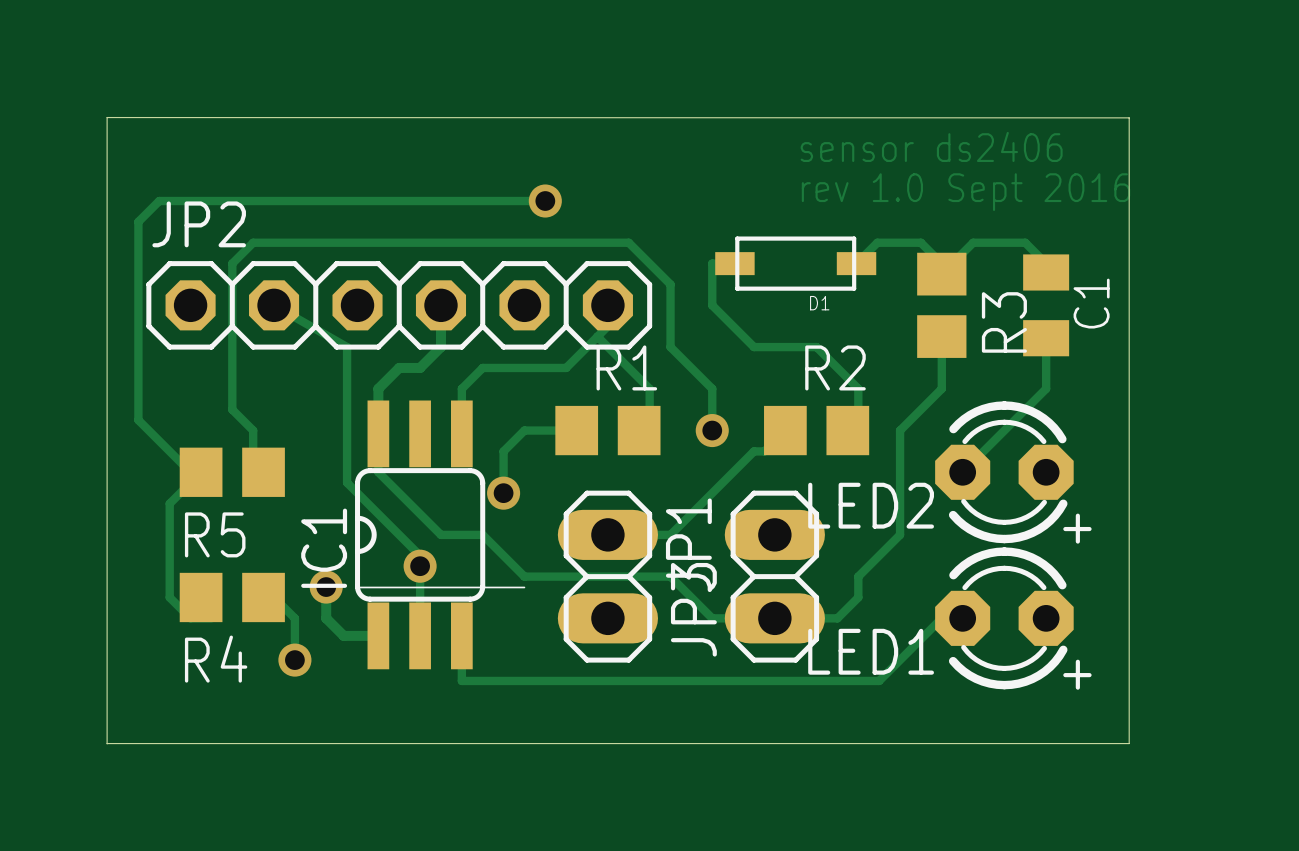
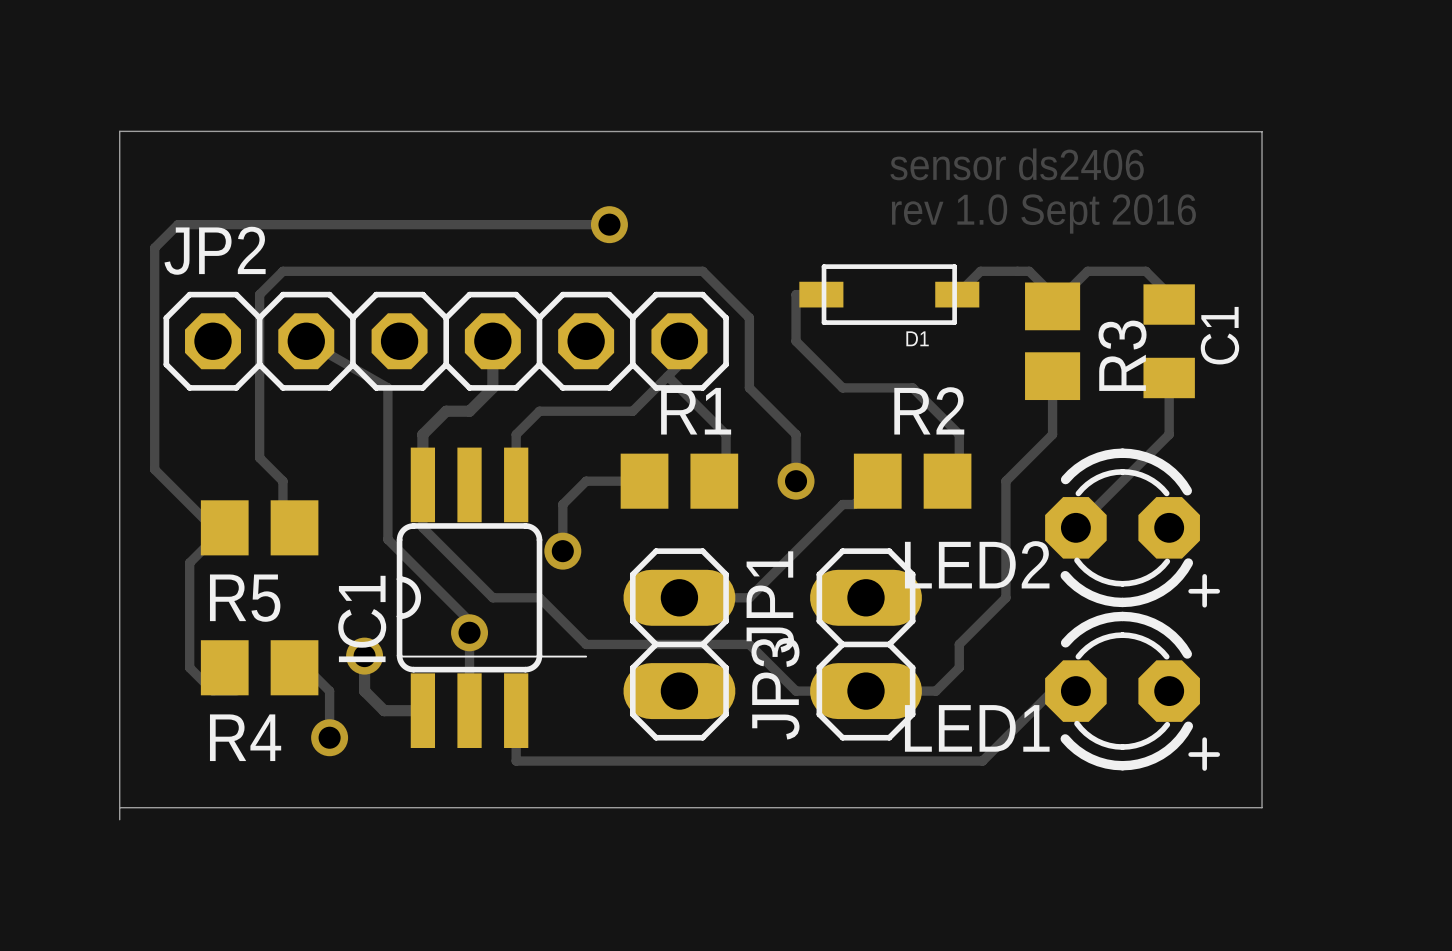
board edge: (1129, 722) (1129, 743) (107, 743) -> (1262, 807) (119, 807)
board edge: (107, 733) (107, 743) -> none

